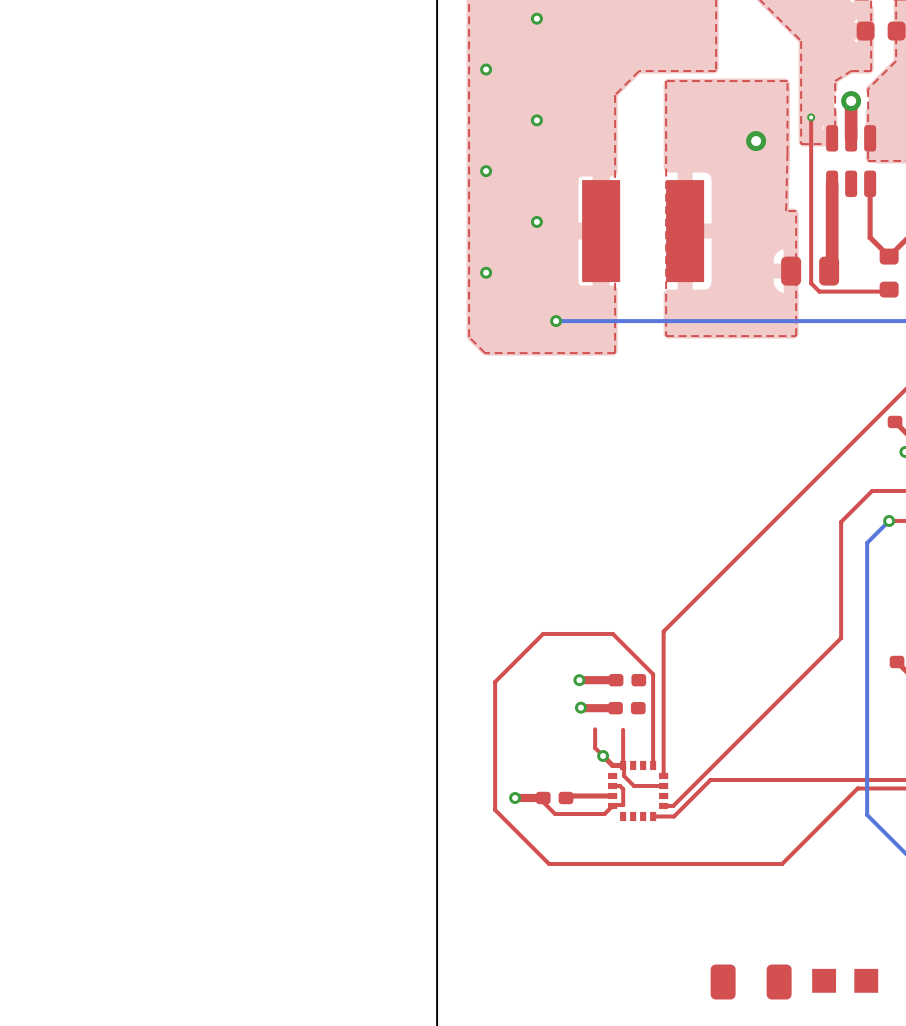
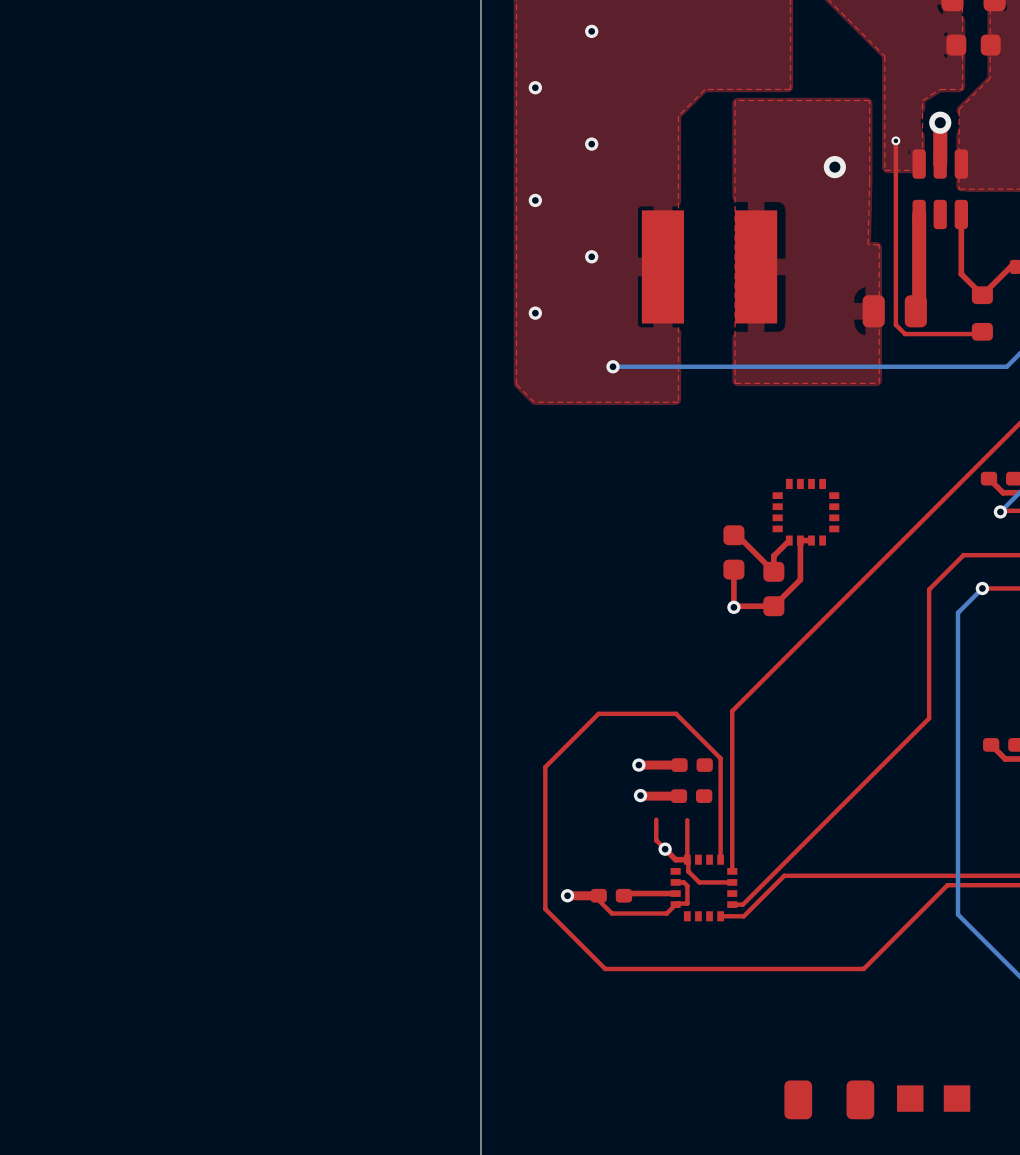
part: none -> (805, 512)
top track: none -> (733, 535) (737, 535) (773, 571) (773, 556) (789, 540)
top track: none -> (811, 540) (800, 540) (800, 579) (773, 606) (733, 607) (733, 569)
part: none -> (733, 552)
part: none -> (773, 589)
via: none -> (733, 607)

